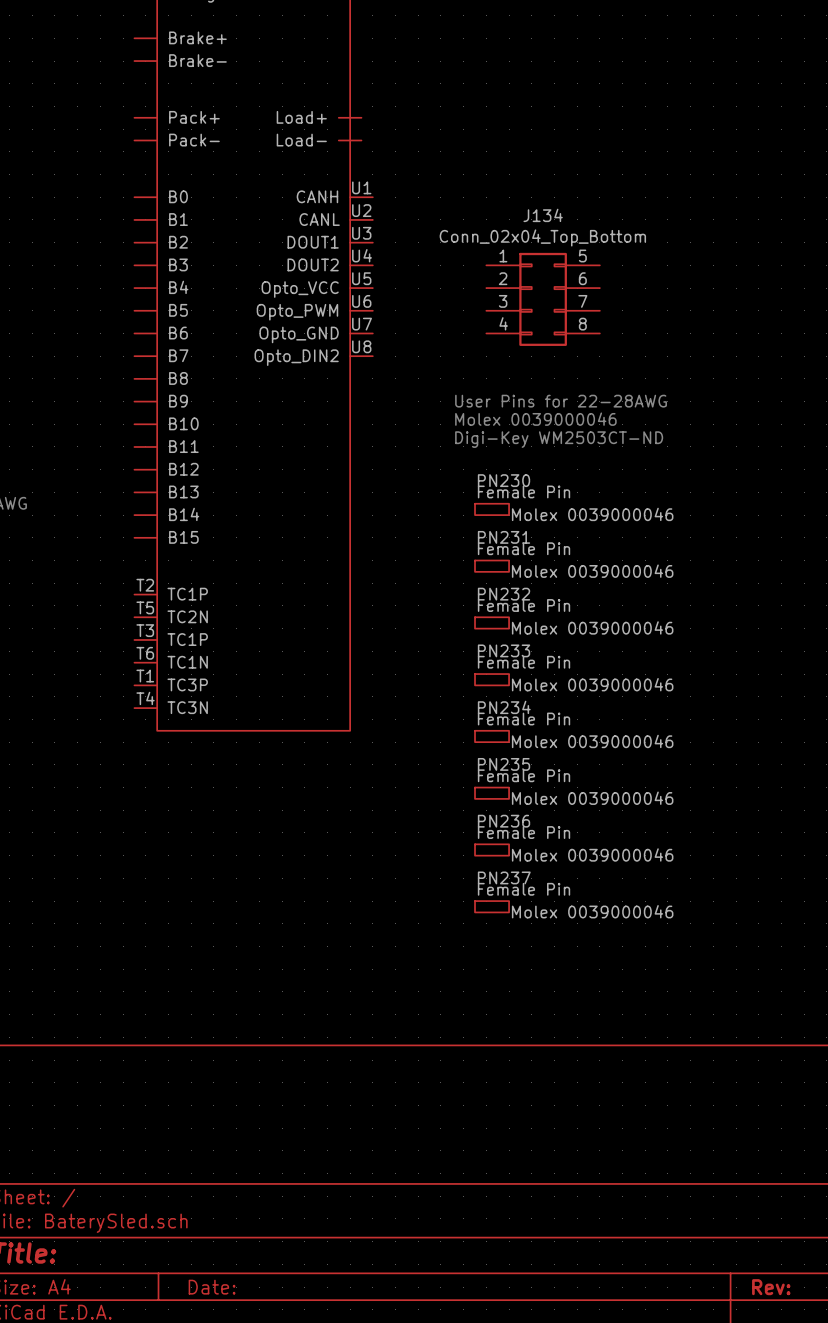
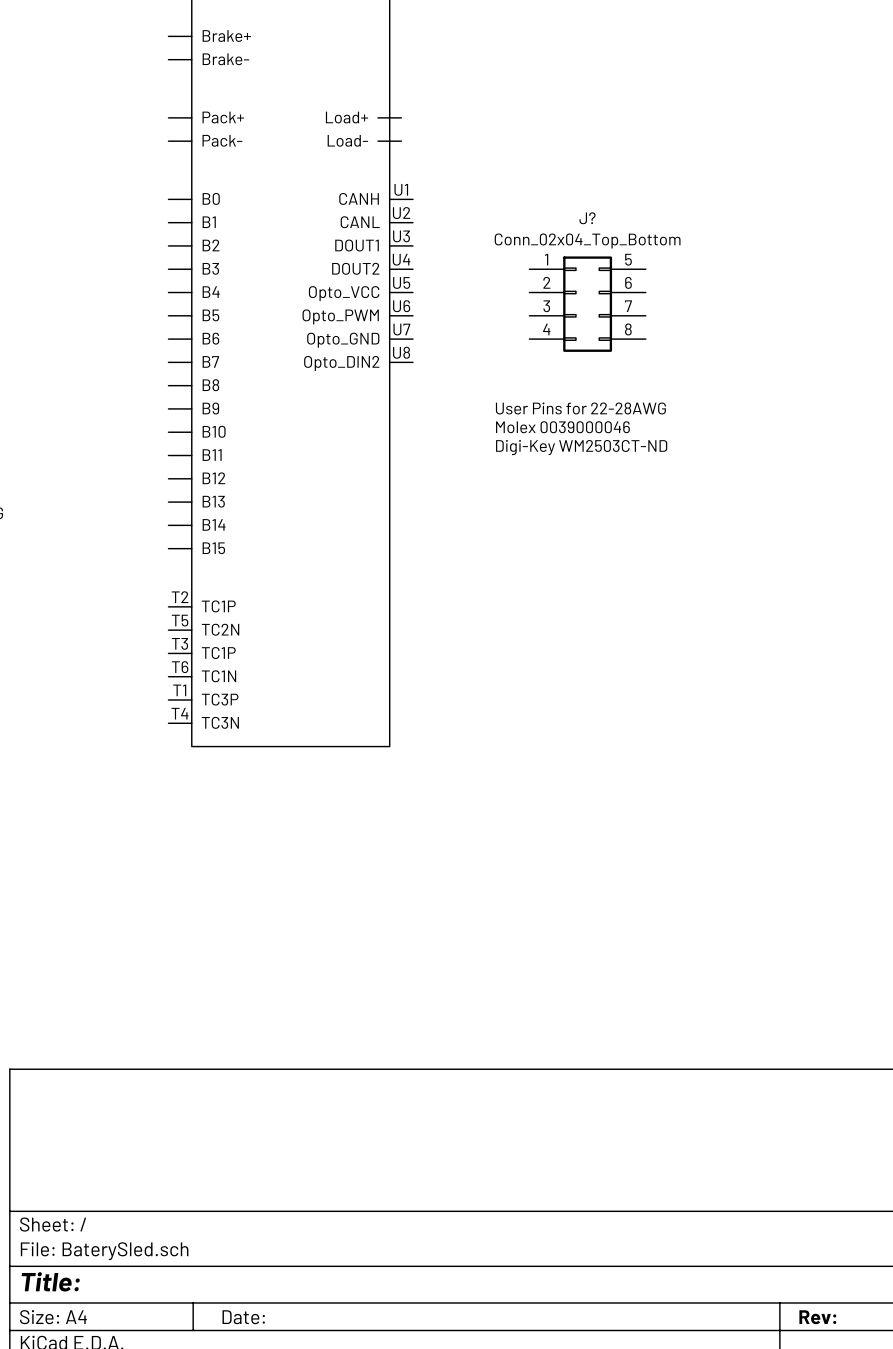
J134 name: J134 (543, 215) -> J? (587, 218)
PN230: Female Pin (492, 509) -> none
PN231: Female Pin (492, 566) -> none
PN232: Female Pin (492, 622) -> none
PN233: Female Pin (492, 679) -> none
PN234: Female Pin (492, 736) -> none
PN235: Female Pin (492, 793) -> none
PN236: Female Pin (492, 849) -> none
PN237: Female Pin (492, 906) -> none

